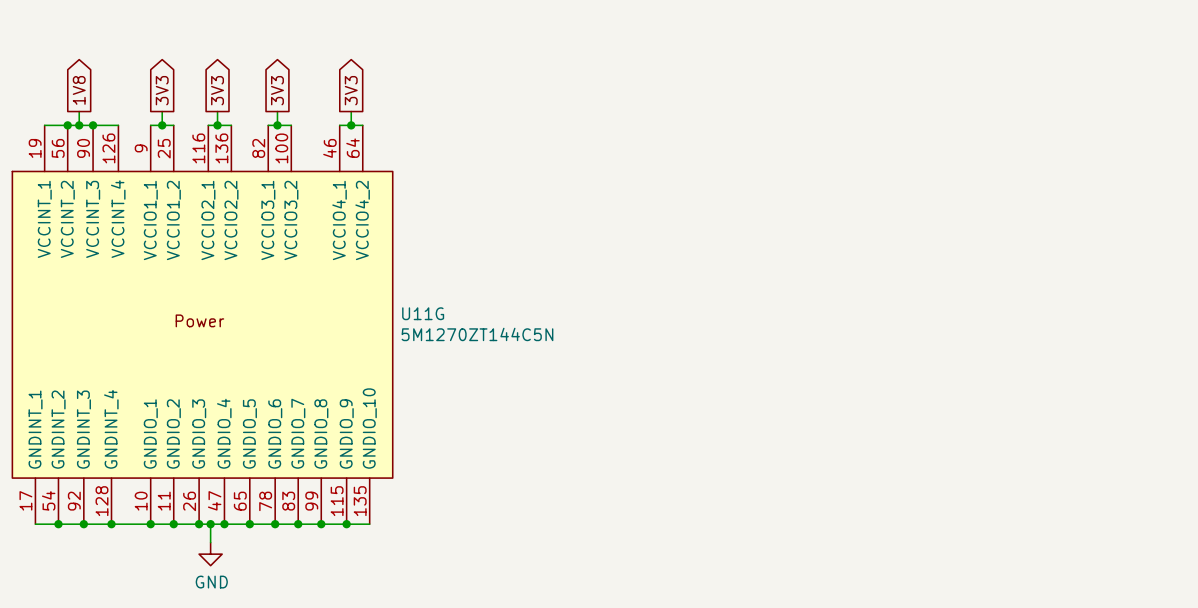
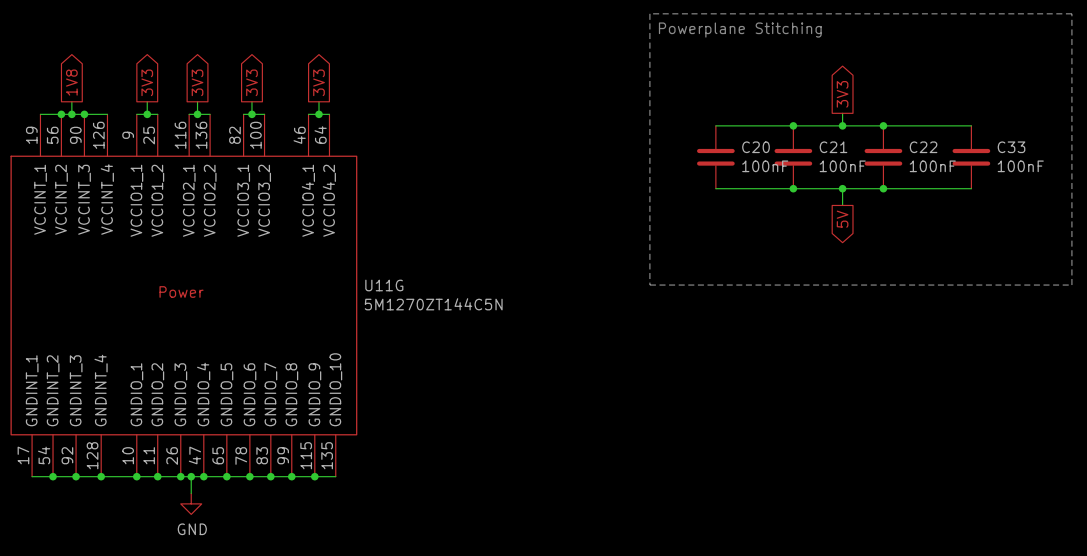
line: none -> (649, 13) (1071, 13) (1071, 285) (649, 285) (649, 13)
text: none -> Powerplane Stitching (740, 30)
global label: none -> 3V3 (842, 94)
wire: none -> (842, 113) (842, 125)
wire: none -> (715, 125) (971, 125)
junction: none -> (793, 125)
junction: none -> (842, 125)
junction: none -> (883, 125)
C20: none -> 100nF (715, 157)
C21: none -> 100nF (793, 157)
C22: none -> 100nF (883, 157)
C33: none -> 100nF (971, 157)
wire: none -> (715, 188) (971, 188)
junction: none -> (793, 188)
wire: none -> (842, 188) (842, 205)
junction: none -> (842, 188)
junction: none -> (883, 188)
global label: none -> 5V (842, 219)

